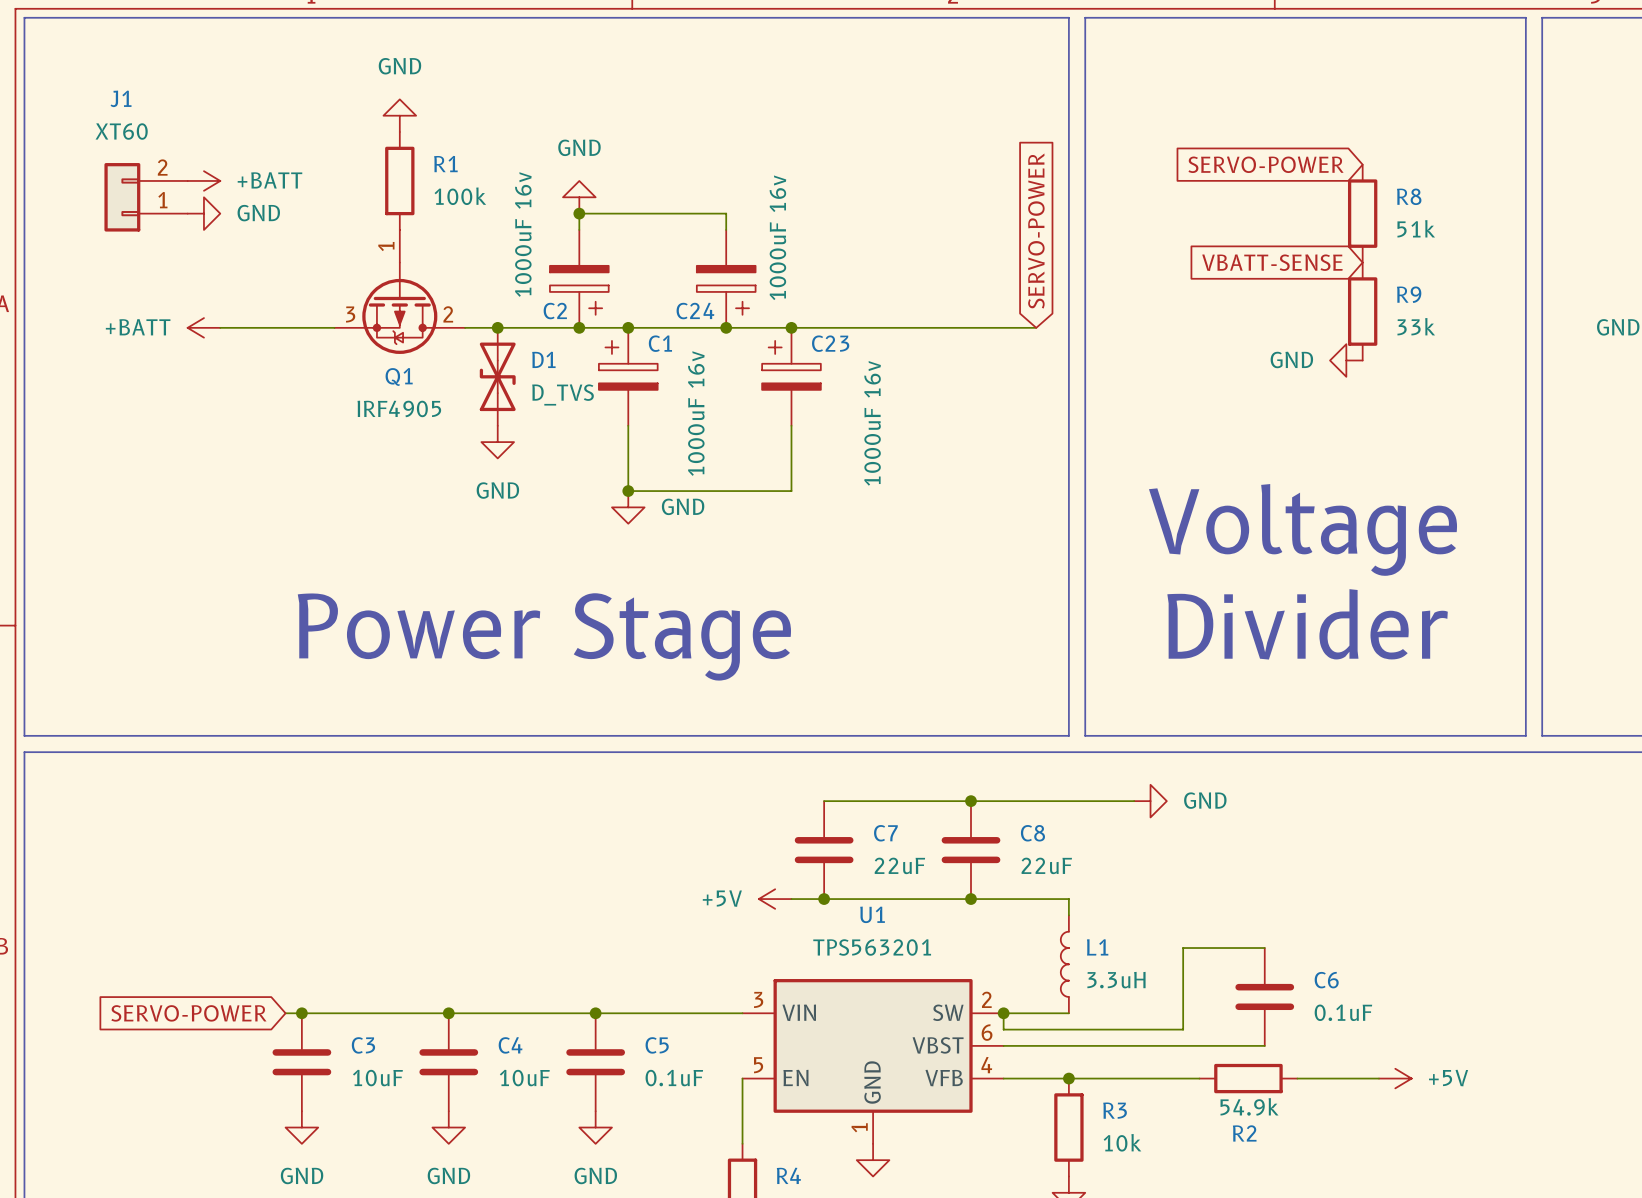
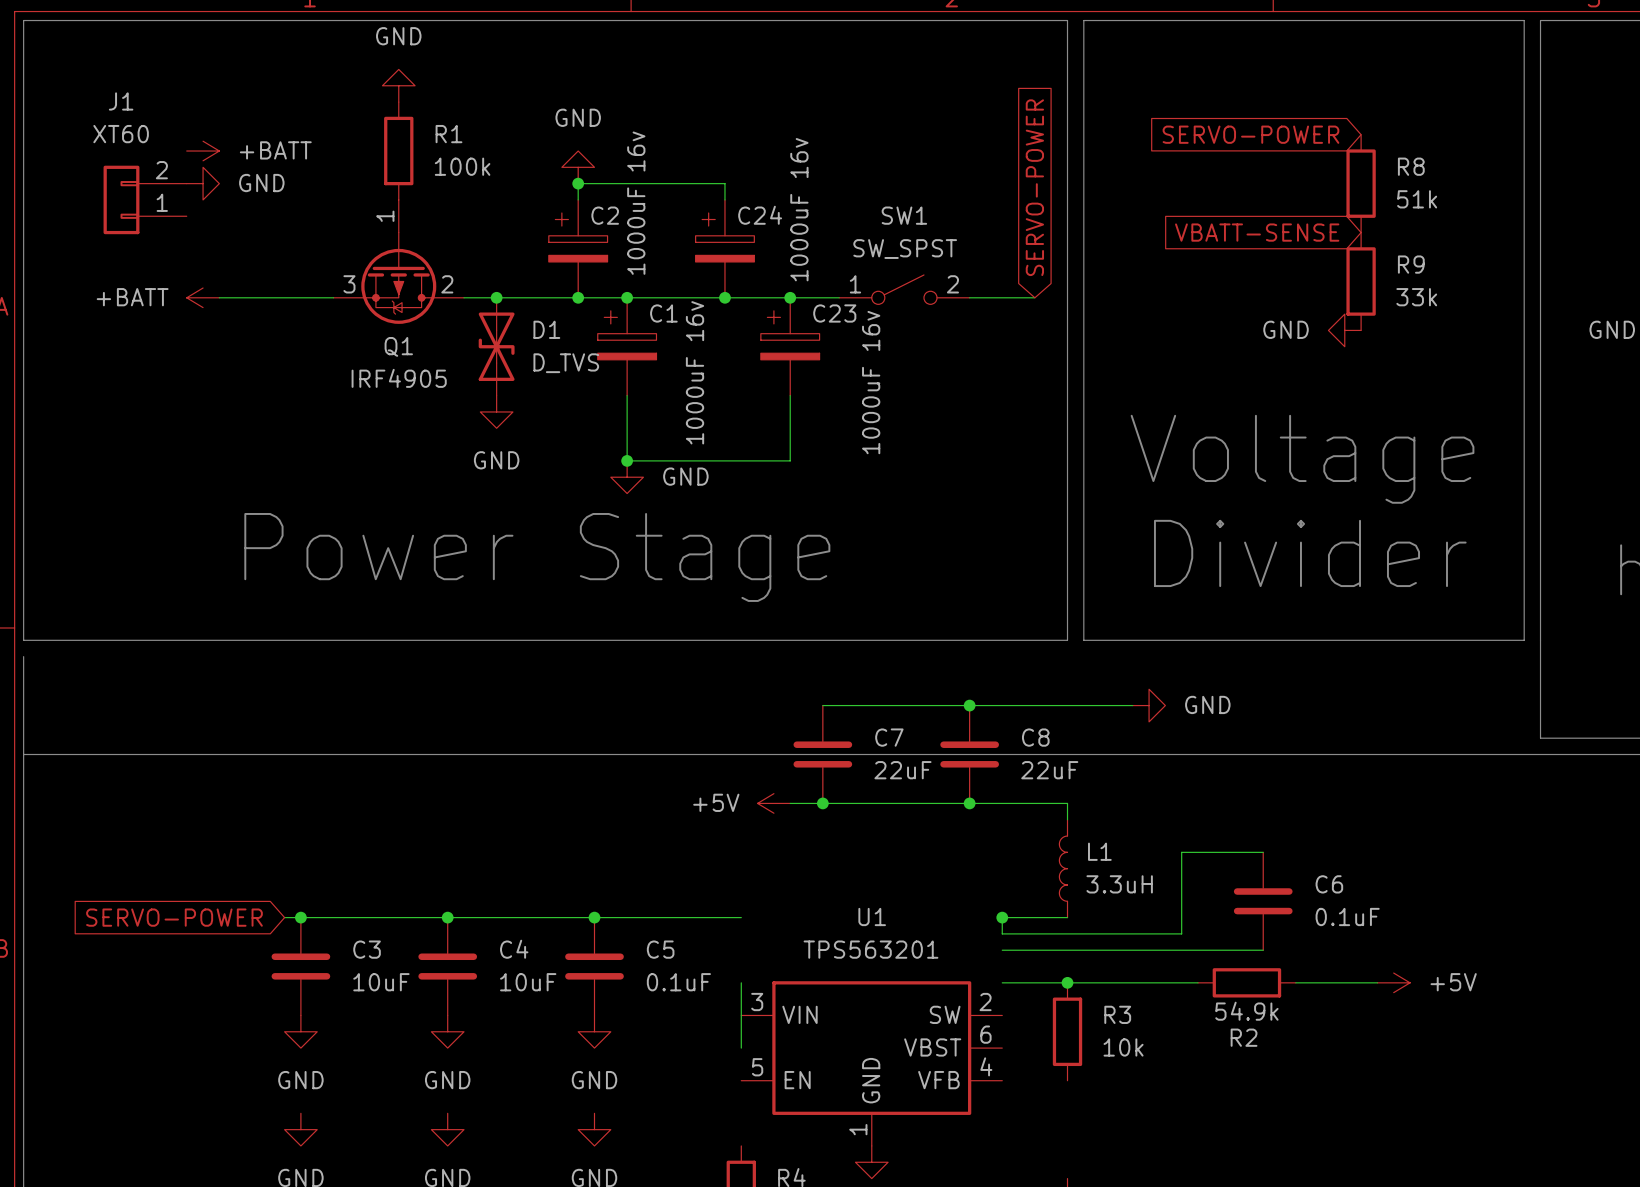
power symbol position: GND (399, 115) -> GND (398, 85)
power symbol: none -> +BATT (203, 151)
global label position: SERVO-POWER (1266, 164) -> SERVO-POWER (1250, 134)
power symbol: +BATT (203, 180) -> GND (203, 183)
R1 position: (399, 180) -> (398, 151)
power symbol position: GND (579, 197) -> GND (578, 167)
power symbol: GND (203, 213) -> none
junction position: (579, 213) -> (578, 183)
R8 position: (1362, 213) -> (1361, 183)
wire: (579, 229) (579, 213) (726, 213) (726, 229) -> (578, 199) (578, 183) (724, 183) (724, 199)
global label position: SERVO-POWER (1036, 231) -> SERVO-POWER (1034, 187)
C2 value position: 1000uF 16v (523, 234) -> 1000uF 16v (636, 203)
C24 value position: 1000uF 16v (777, 237) -> 1000uF 16v (799, 209)
global label position: VBATT-SENSE (1272, 262) -> VBATT-SENSE (1257, 232)
SW1: none -> SW_SPST (904, 289)
C2 rotation: 0° (579, 290) -> 180° (578, 237)
C24 rotation: 0° (726, 290) -> 180° (724, 237)
Q1 position: (399, 291) -> (398, 261)
wire: none -> (464, 297) (839, 297)
junction: none -> (578, 297)
junction: none -> (627, 297)
wire: none -> (969, 297) (1034, 297)
R9 position: (1362, 311) -> (1361, 281)
power symbol position: +BATT (203, 327) -> +BATT (203, 297)
wire: (220, 327) (334, 327) -> (219, 297) (333, 297)
wire: (465, 327) (1036, 327) -> none
junction position: (497, 327) -> (496, 297)
junction: (579, 327) -> none
junction: (628, 327) -> none
junction position: (726, 327) -> (724, 297)
junction position: (791, 327) -> (790, 297)
power symbol position: GND (1346, 360) -> GND (1344, 330)
D1 position: (497, 376) -> (496, 346)
C1 position: (628, 376) -> (627, 346)
C23 position: (791, 376) -> (790, 346)
power symbol position: GND (497, 442) -> GND (496, 411)
wire: (628, 458) (628, 491) (791, 491) (791, 458) -> (627, 460) (790, 460)
junction position: (628, 491) -> (627, 460)
power symbol position: GND (628, 507) -> GND (627, 477)
text position: Voltage (1302, 529) -> Voltage (1302, 459)
text position: Divider (1307, 624) -> Divider (1310, 553)
text position: Power Stage (544, 636) -> Power Stage (537, 557)
line: (24, 637) (24, 654) -> (23, 738) (23, 754)
line: (1068, 637) (1068, 735) (24, 735) -> (1067, 640) (23, 640)
line: (1085, 637) (1085, 735) (1525, 735) (1525, 637) -> (1083, 640) (1524, 640)
wire: none -> (822, 705) (1132, 705)
junction: none -> (969, 705)
wire: none -> (790, 803) (822, 803)
junction: none -> (822, 803)
wire: (1068, 801) (1134, 801) -> (1067, 803) (1067, 819)
power symbol position: GND (1150, 801) -> GND (1149, 705)
C7 position: (824, 850) -> (822, 754)
C8 position: (971, 850) -> (969, 754)
power symbol position: +5V (775, 899) -> +5V (773, 803)
wire: (791, 899) (1068, 899) (1068, 915) -> (1263, 852) (1181, 852) (1181, 933) (1002, 933) (1002, 917) (1067, 917)
junction: (824, 899) -> none
junction position: (971, 899) -> (1002, 917)
junction: none -> (300, 917)
junction: none -> (447, 917)
junction: none -> (594, 917)
wire: (1183, 948) (1183, 1029) (1003, 1029) (1003, 1013) (1068, 1013) -> (1181, 950) (1002, 950)
L1 position: (1064, 964) -> (1063, 868)
junction: none -> (1067, 982)
C6 position: (1264, 996) -> (1263, 901)
global label position: SERVO-POWER (188, 1013) -> SERVO-POWER (174, 917)
wire: (285, 1013) (742, 1013) -> (284, 917) (741, 917)
junction: (301, 1013) -> none
junction: (448, 1013) -> none
junction: (595, 1013) -> none
junction: (1003, 1013) -> none
power symbol: none -> GND (300, 1031)
power symbol: none -> GND (447, 1031)
power symbol: none -> GND (594, 1031)
wire: (1003, 1045) (1264, 1045) -> none
C3 position: (301, 1062) -> (300, 966)
C4 position: (448, 1062) -> (447, 966)
C5 position: (595, 1062) -> (594, 966)
wire: (742, 1078) (742, 1143) -> (741, 982) (741, 1048)
wire: (1003, 1078) (1199, 1078) -> (1002, 982) (1197, 982)
junction: (1068, 1078) -> none
R2 position: (1248, 1078) -> (1246, 982)
wire: (1297, 1078) (1378, 1078) -> (1295, 982) (1377, 982)
power symbol position: +5V (1395, 1078) -> +5V (1393, 982)
R3 position: (1068, 1127) -> (1067, 1031)

